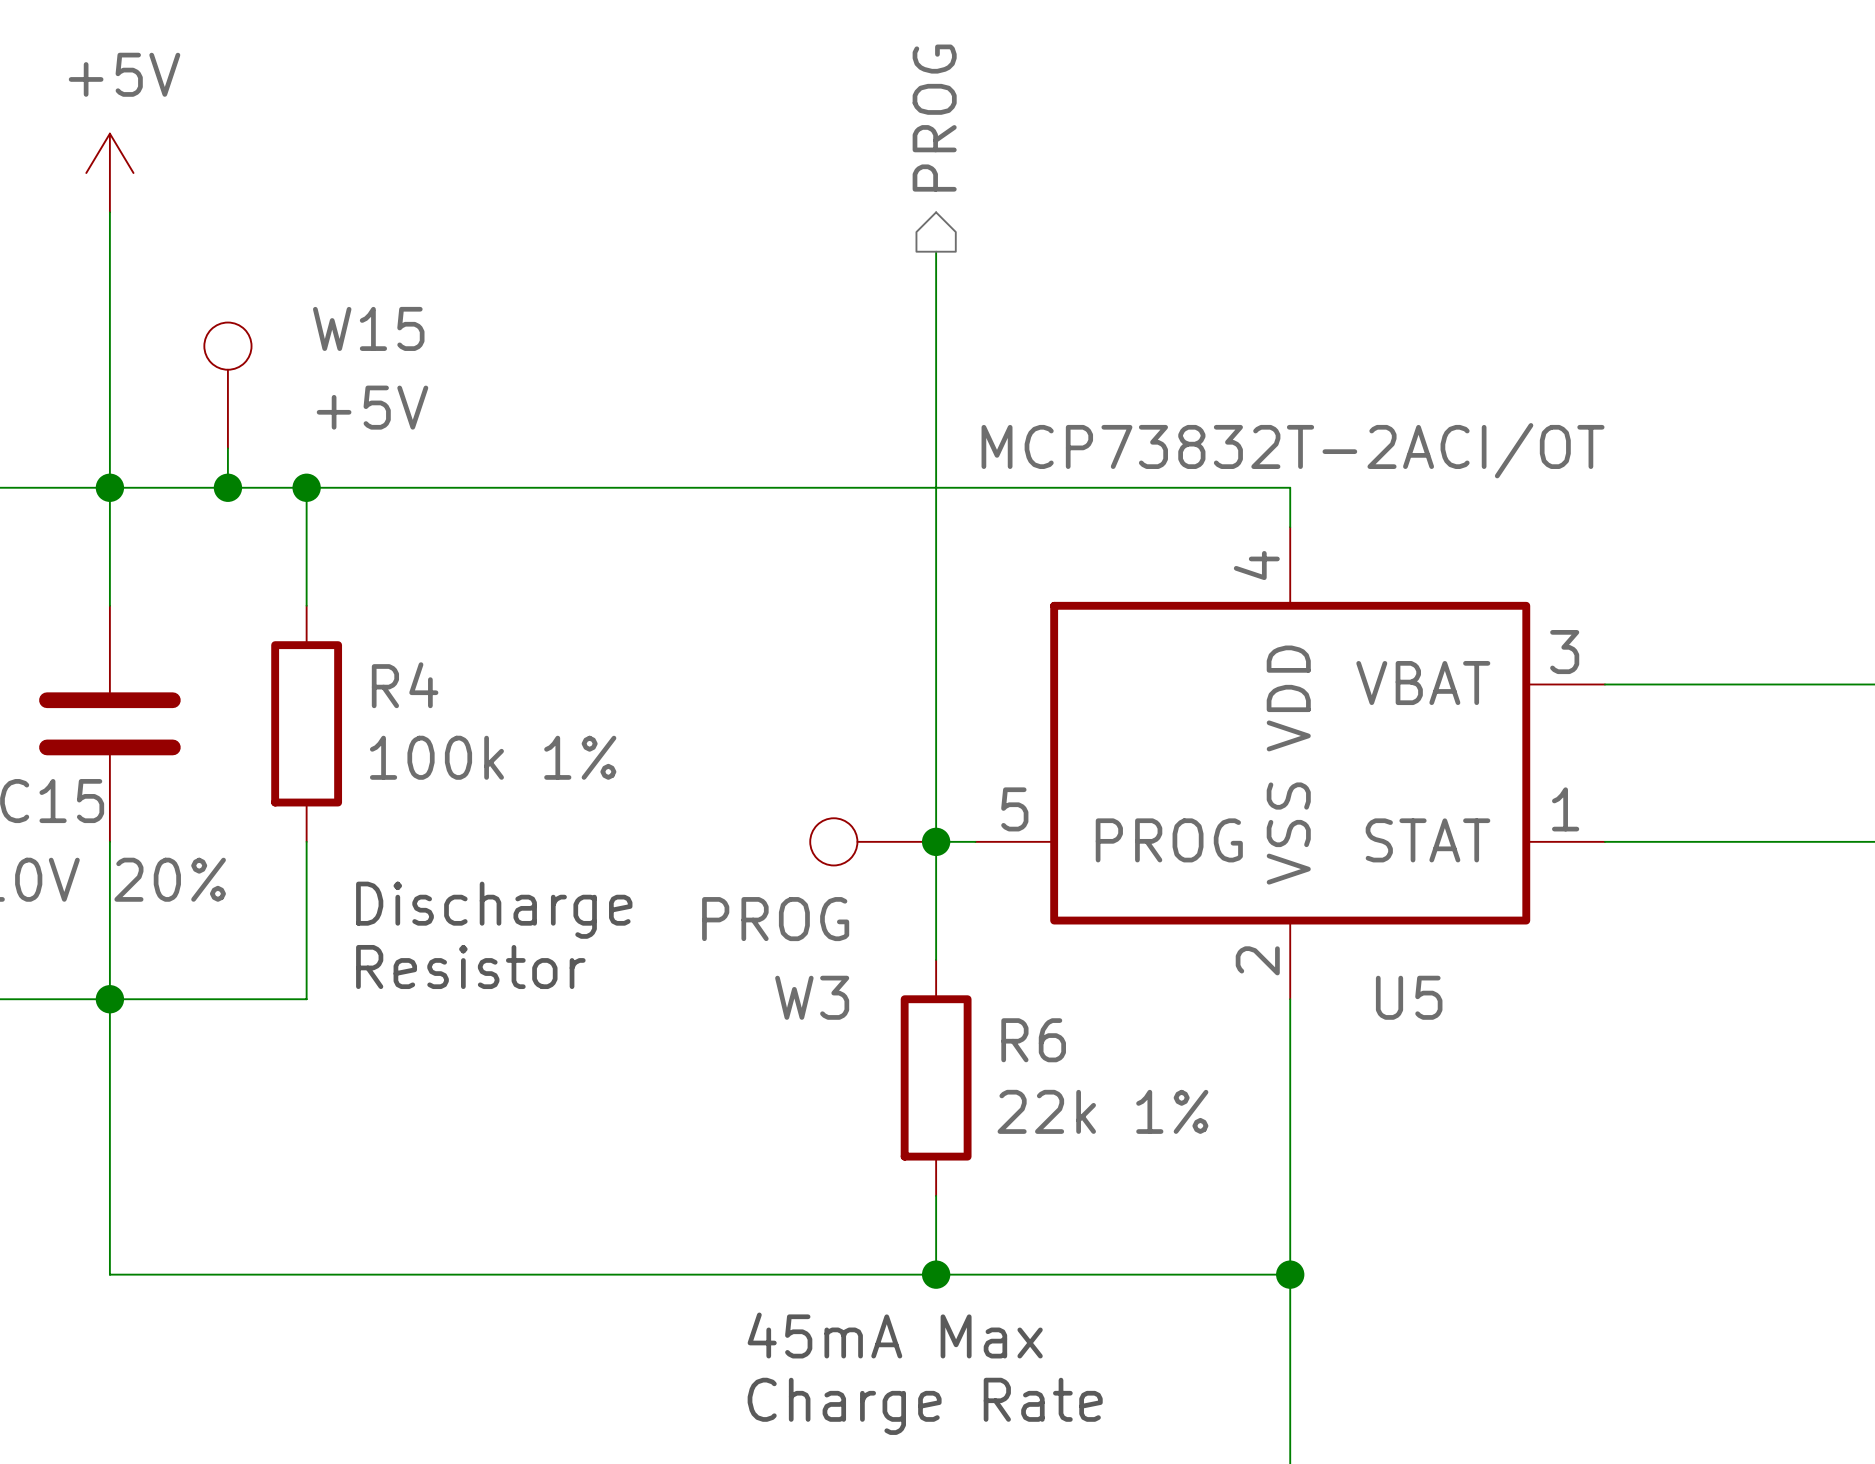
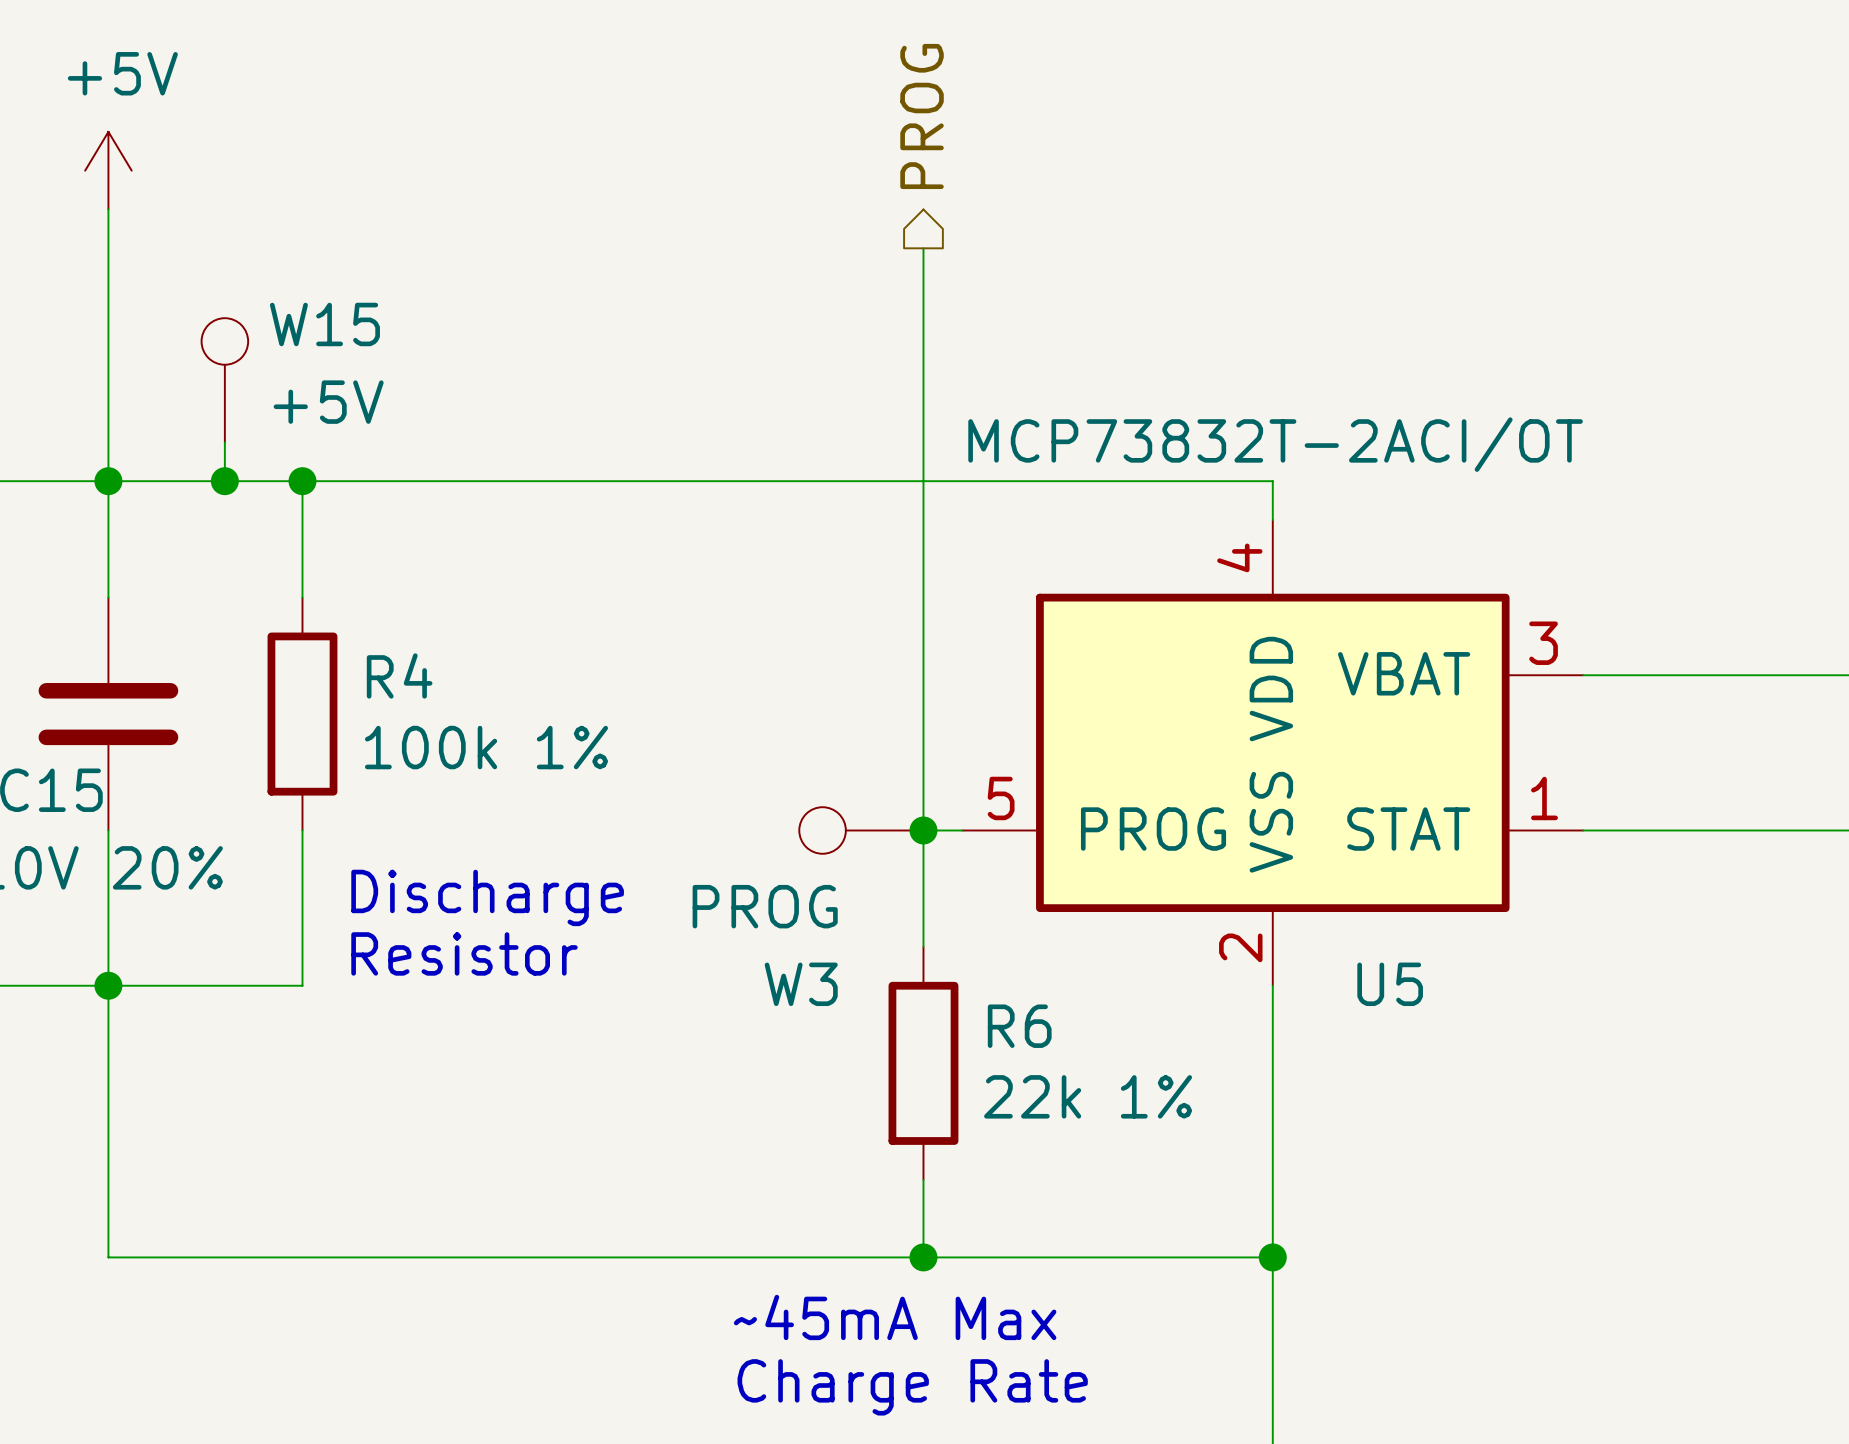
W15 name position: W15 (368, 328) -> W15 (324, 324)
W15 value position: +5V (372, 407) -> +5V (328, 402)
text: 45mA Max (895, 1335) -> ~45mA Max (895, 1317)

